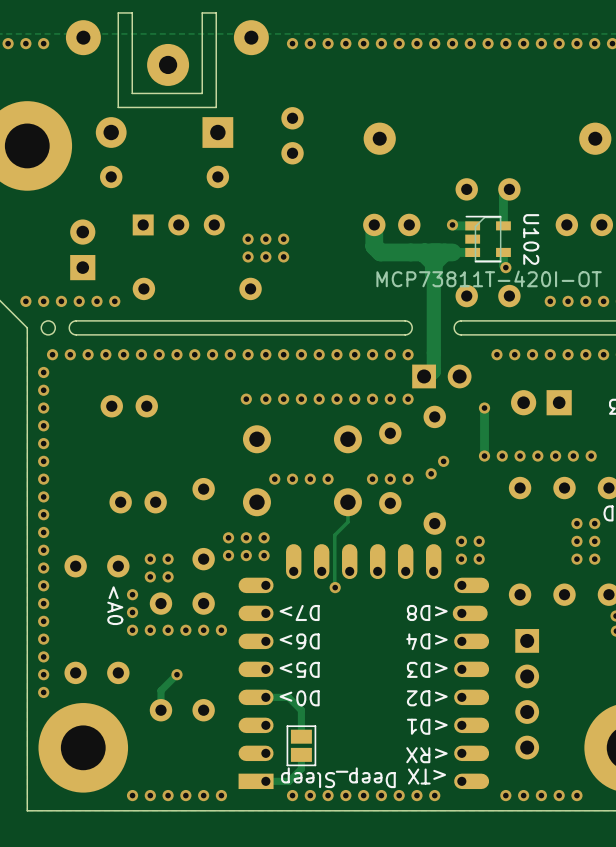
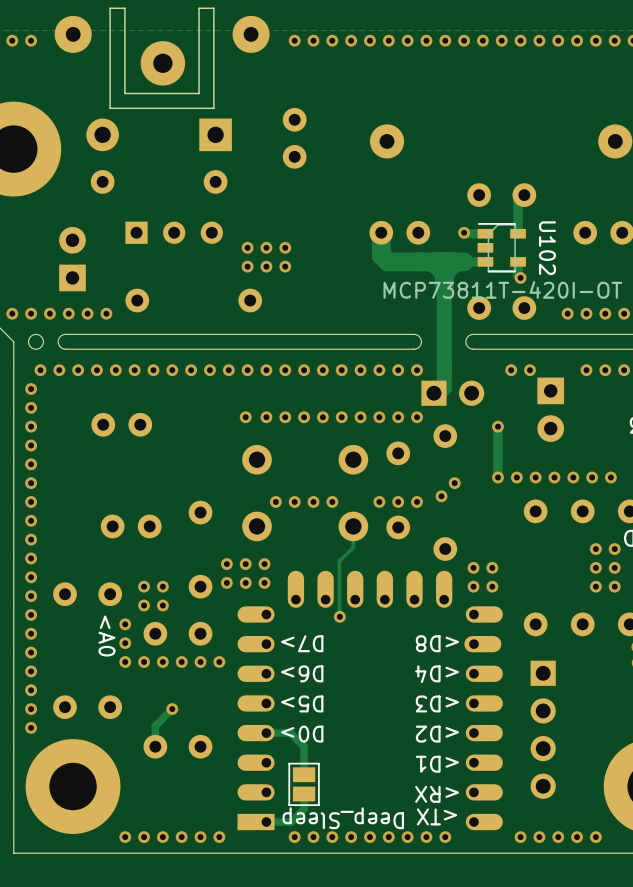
via: (532, 354) -> none
via: (550, 354) -> none
part rotation: 0° (541, 402) -> 90° counterclockwise (550, 409)

